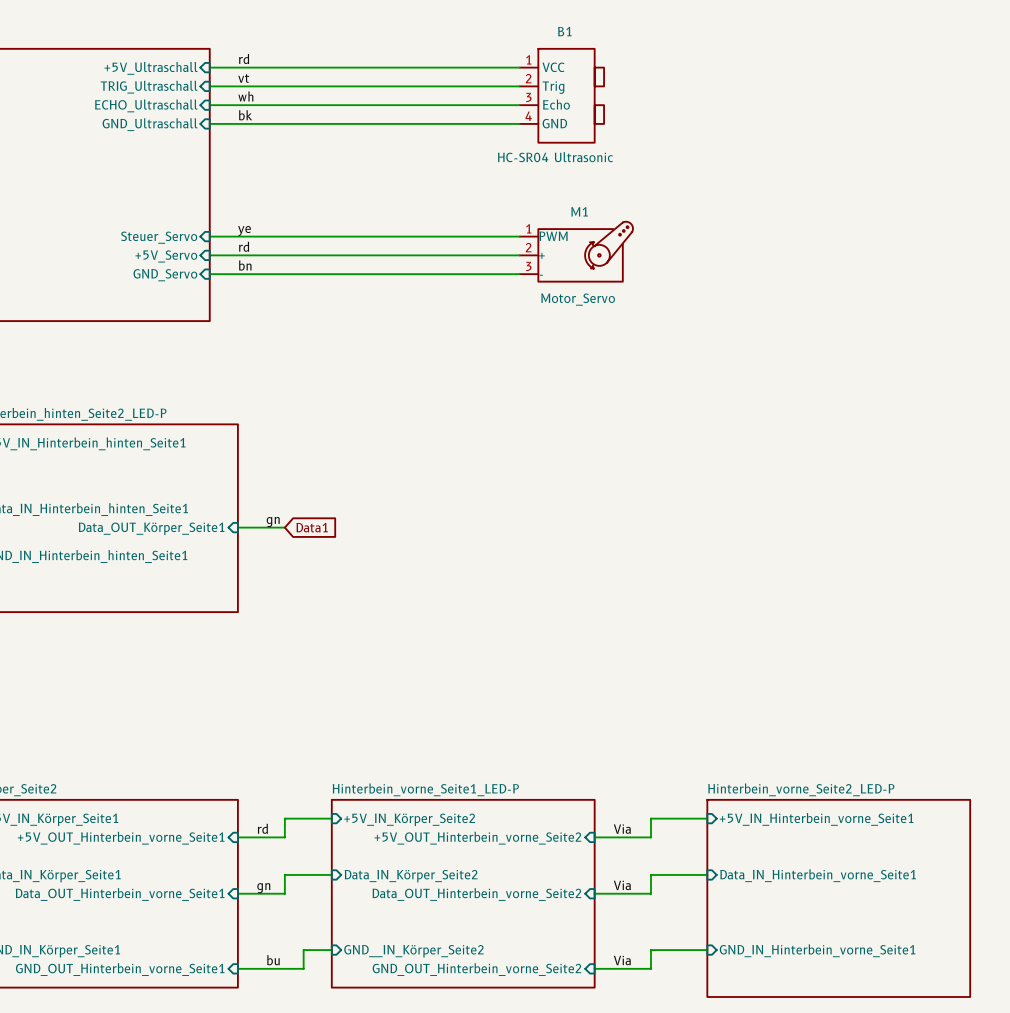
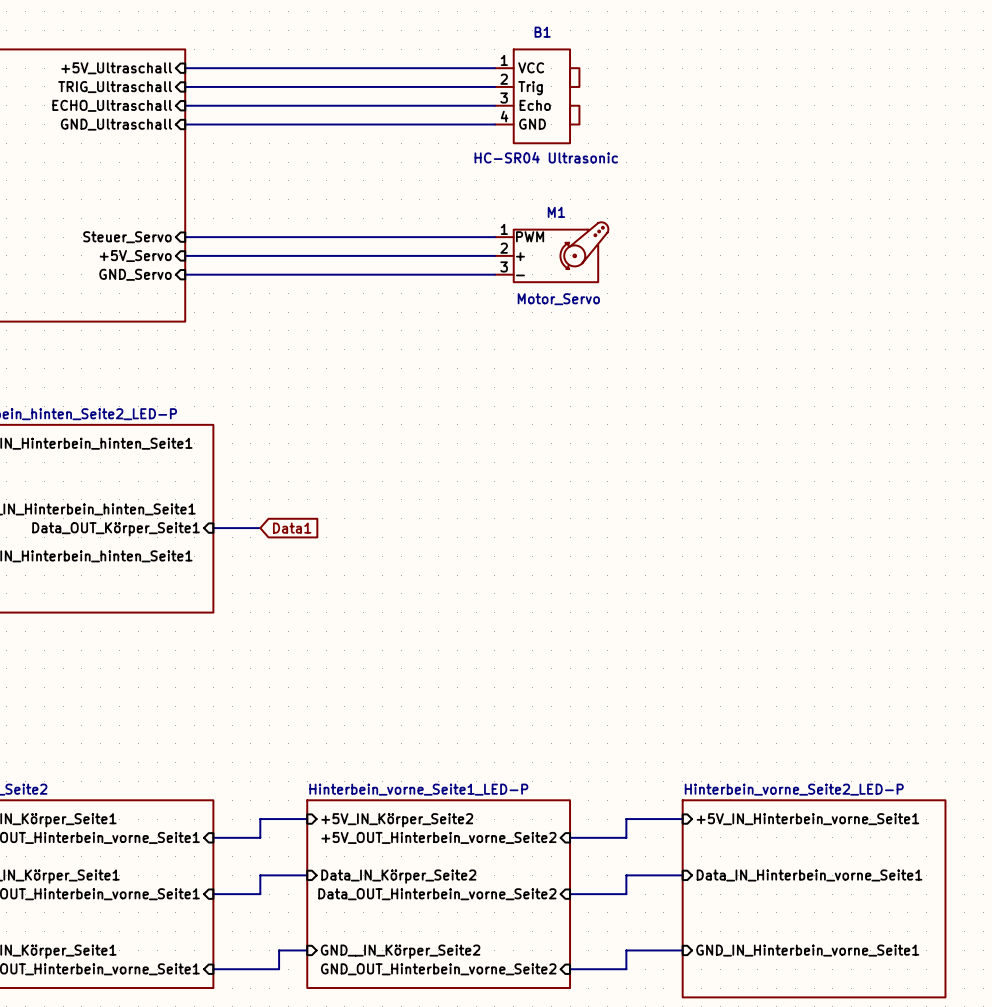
label: rd (244, 58) -> none
label: vt (243, 78) -> none
label: wh (245, 96) -> none
label: bk (245, 115) -> none
label: ye (244, 230) -> none
label: rd (244, 246) -> none
label: bn (245, 265) -> none
label: gn (273, 522) -> none
label: rd (262, 828) -> none
label: Via (622, 829) -> none
label: Via (622, 885) -> none
label: gn (263, 888) -> none
label: bu (273, 960) -> none
label: Via (622, 960) -> none

